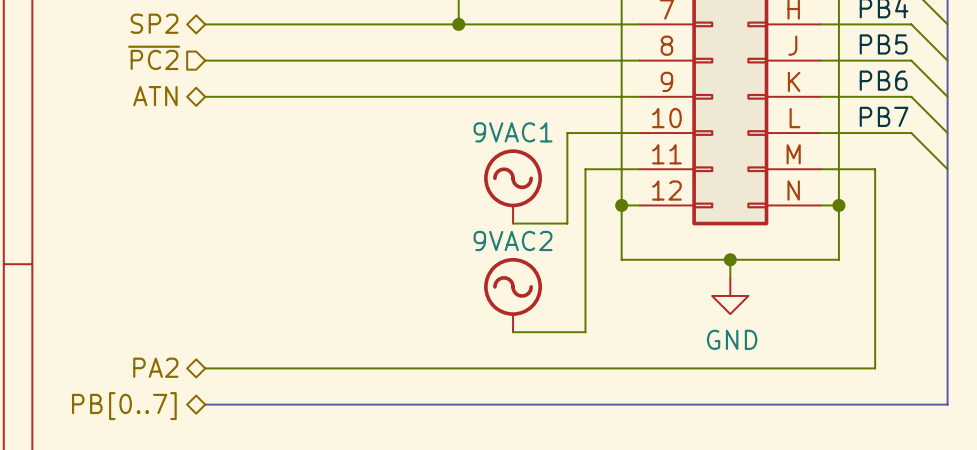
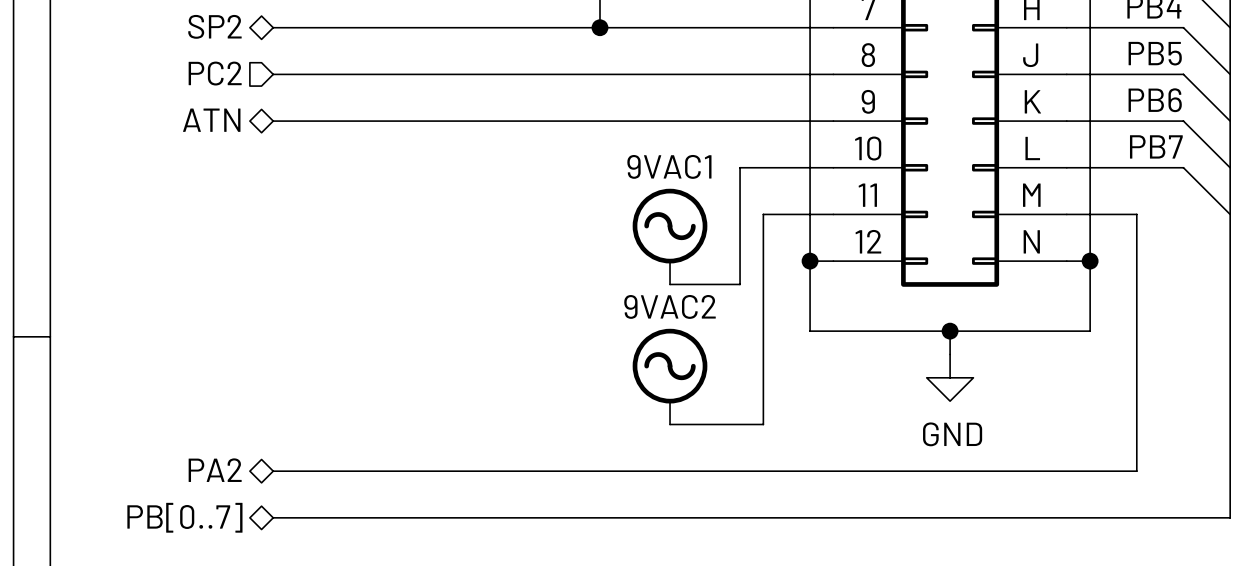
hierarchical label: ~{PC2} (154, 57) -> PC2 (215, 73)

